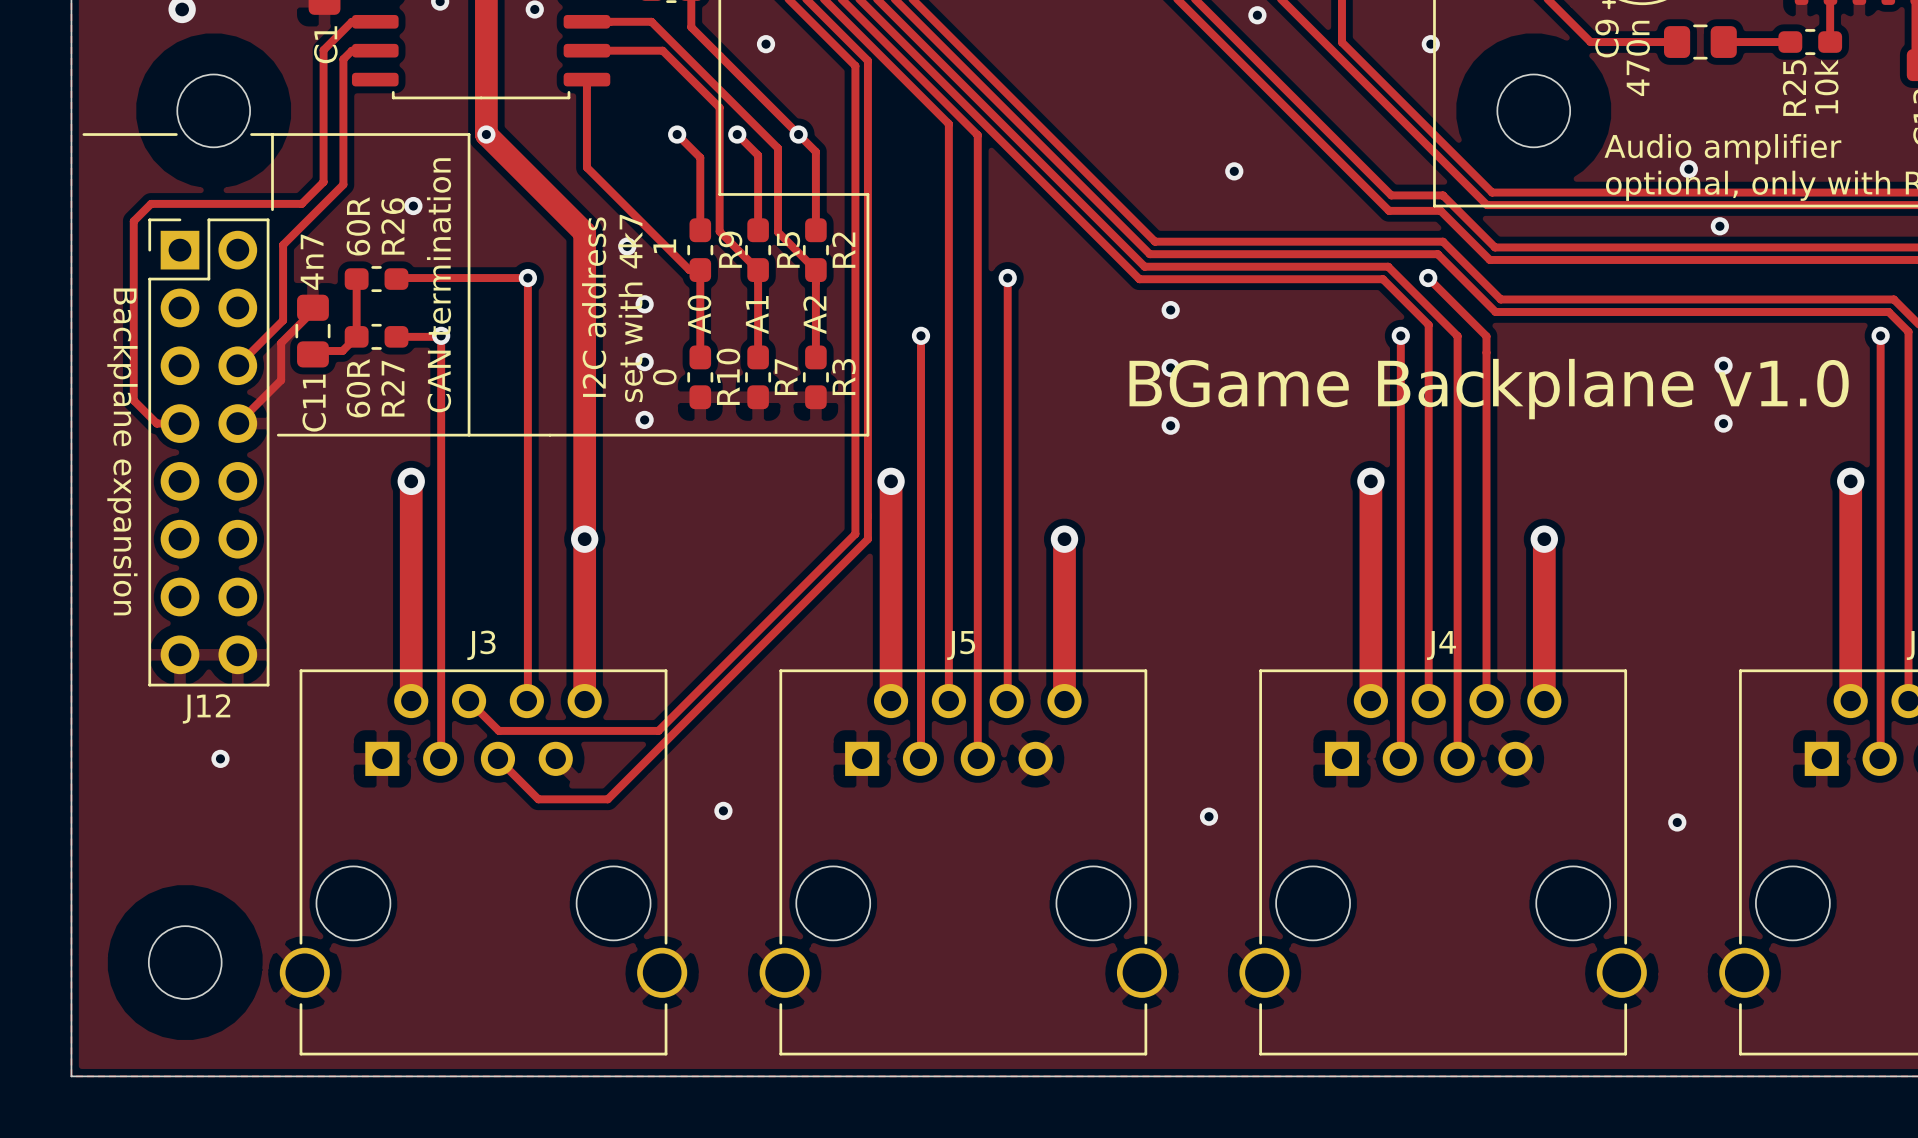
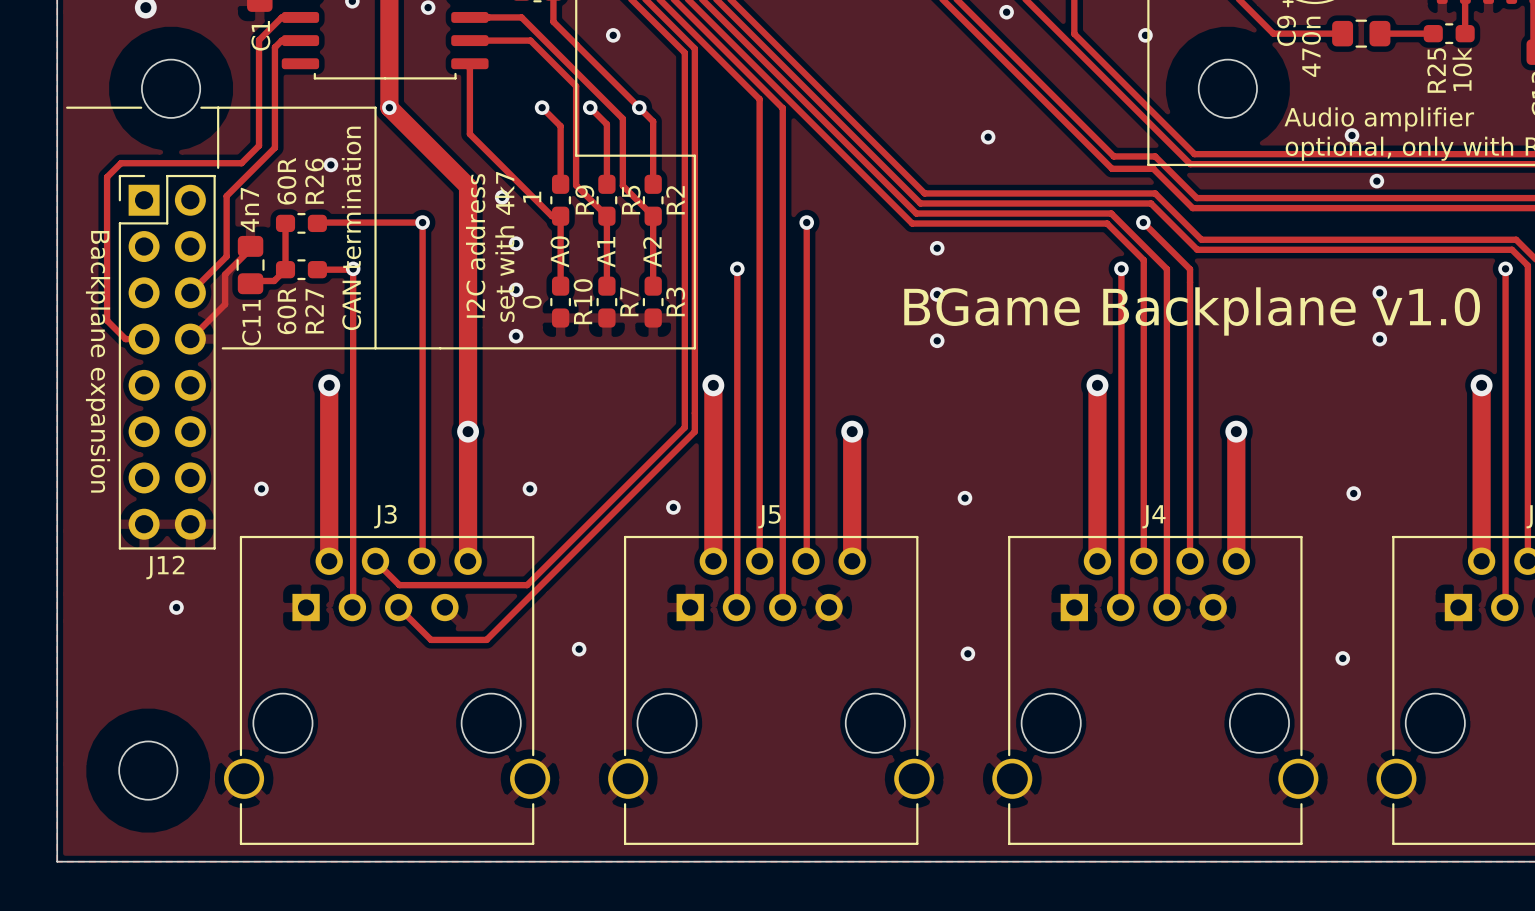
via: none -> (261, 488)
via: none -> (529, 488)
via: none -> (1353, 493)
via: none -> (964, 498)
via: none -> (673, 507)

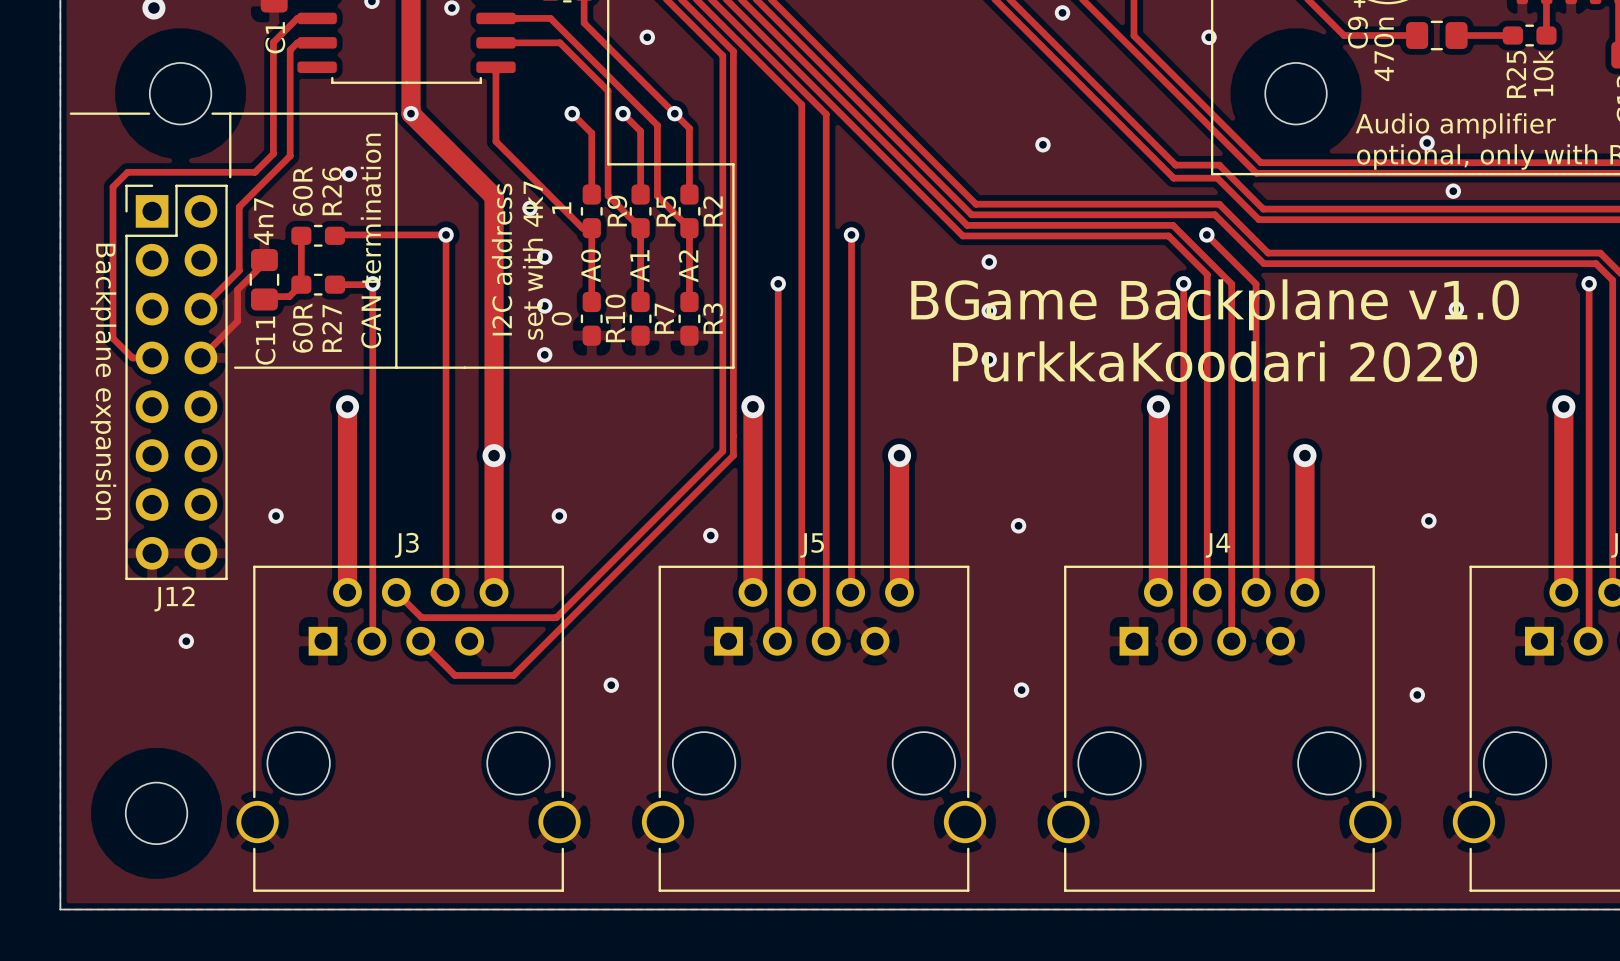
text position: BGame Backplane v1.0 (1192, 311) -> BGame Backplane v1.0 (1215, 304)
text: none -> PurkkaKoodari 2020 (1215, 361)

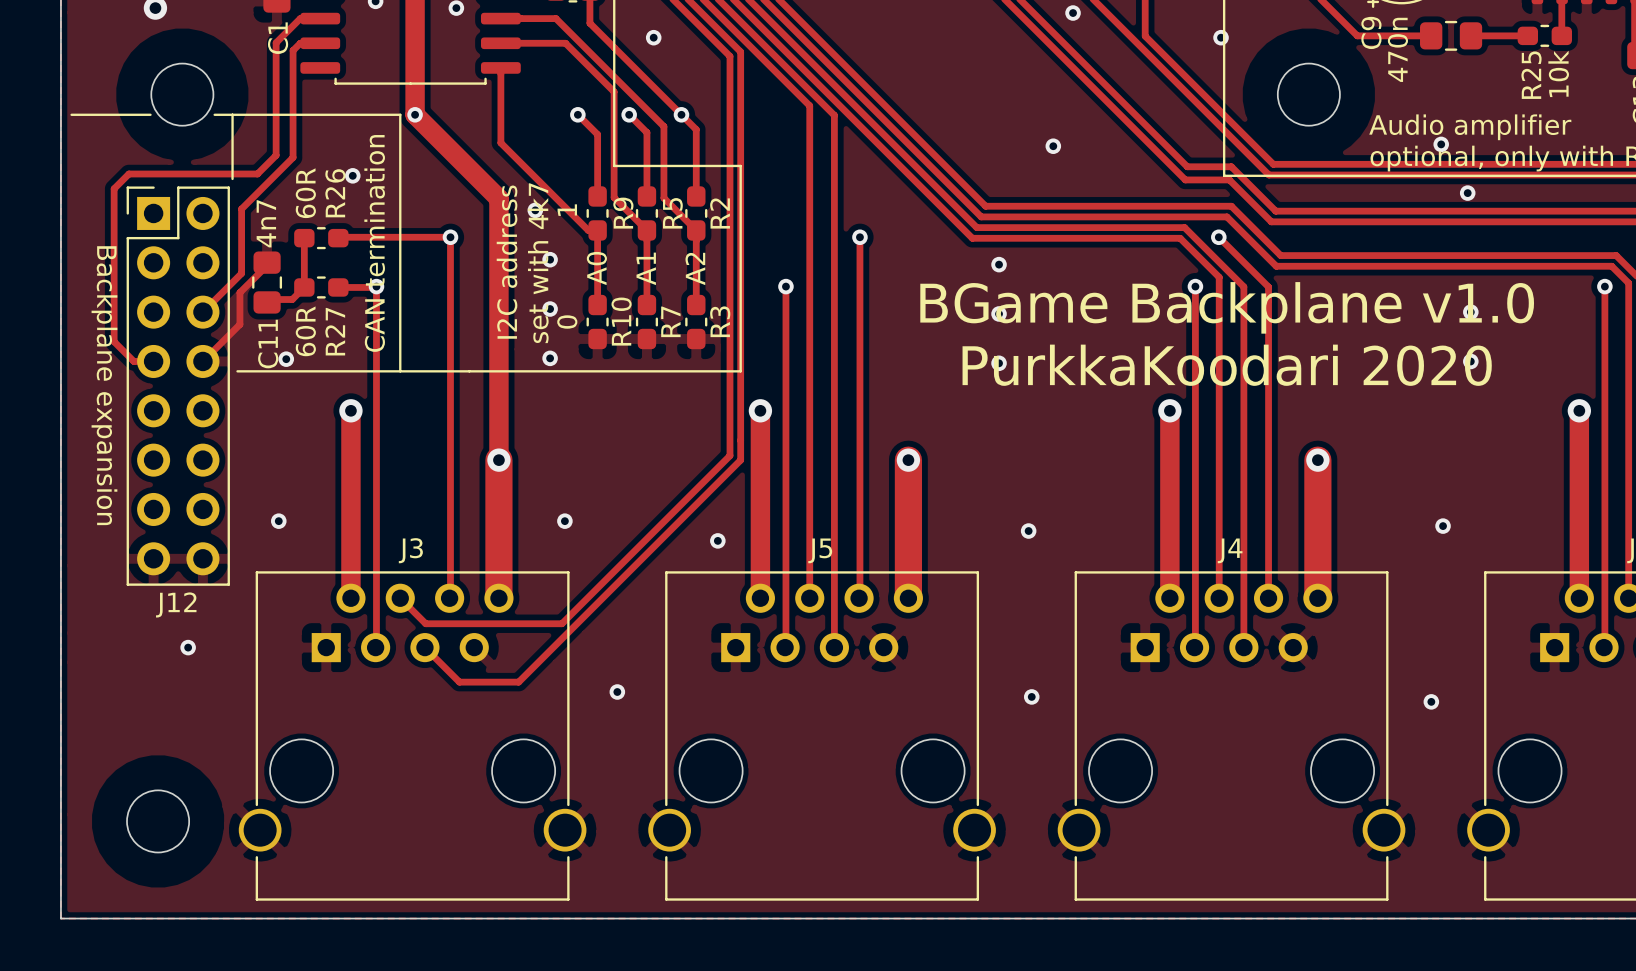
via: none -> (286, 359)
track width: thin (494, 455) (494, 592) -> thick (498, 460) (498, 598)
track width: thin (899, 455) (899, 592) -> thick (908, 460) (908, 598)
track width: thin (1304, 455) (1304, 592) -> thick (1317, 460) (1317, 598)

